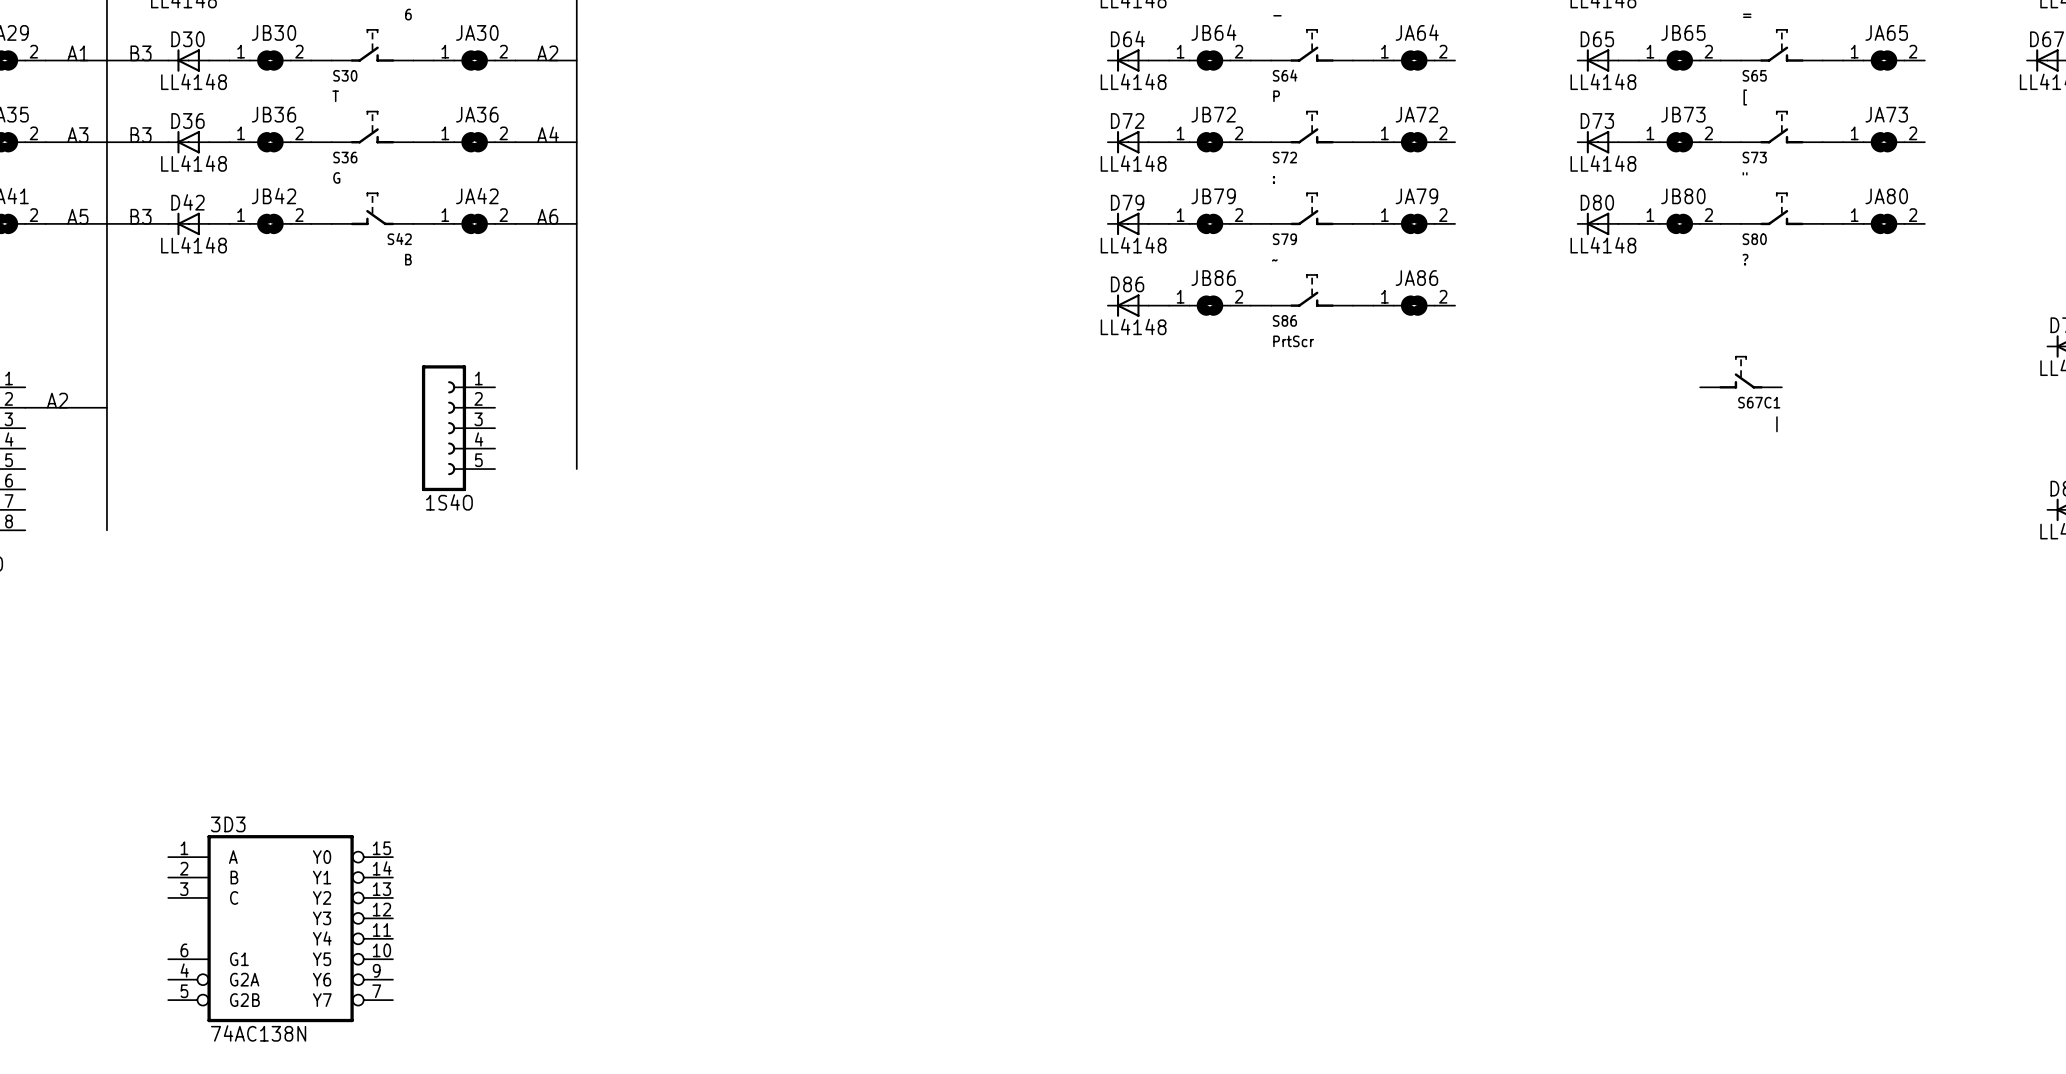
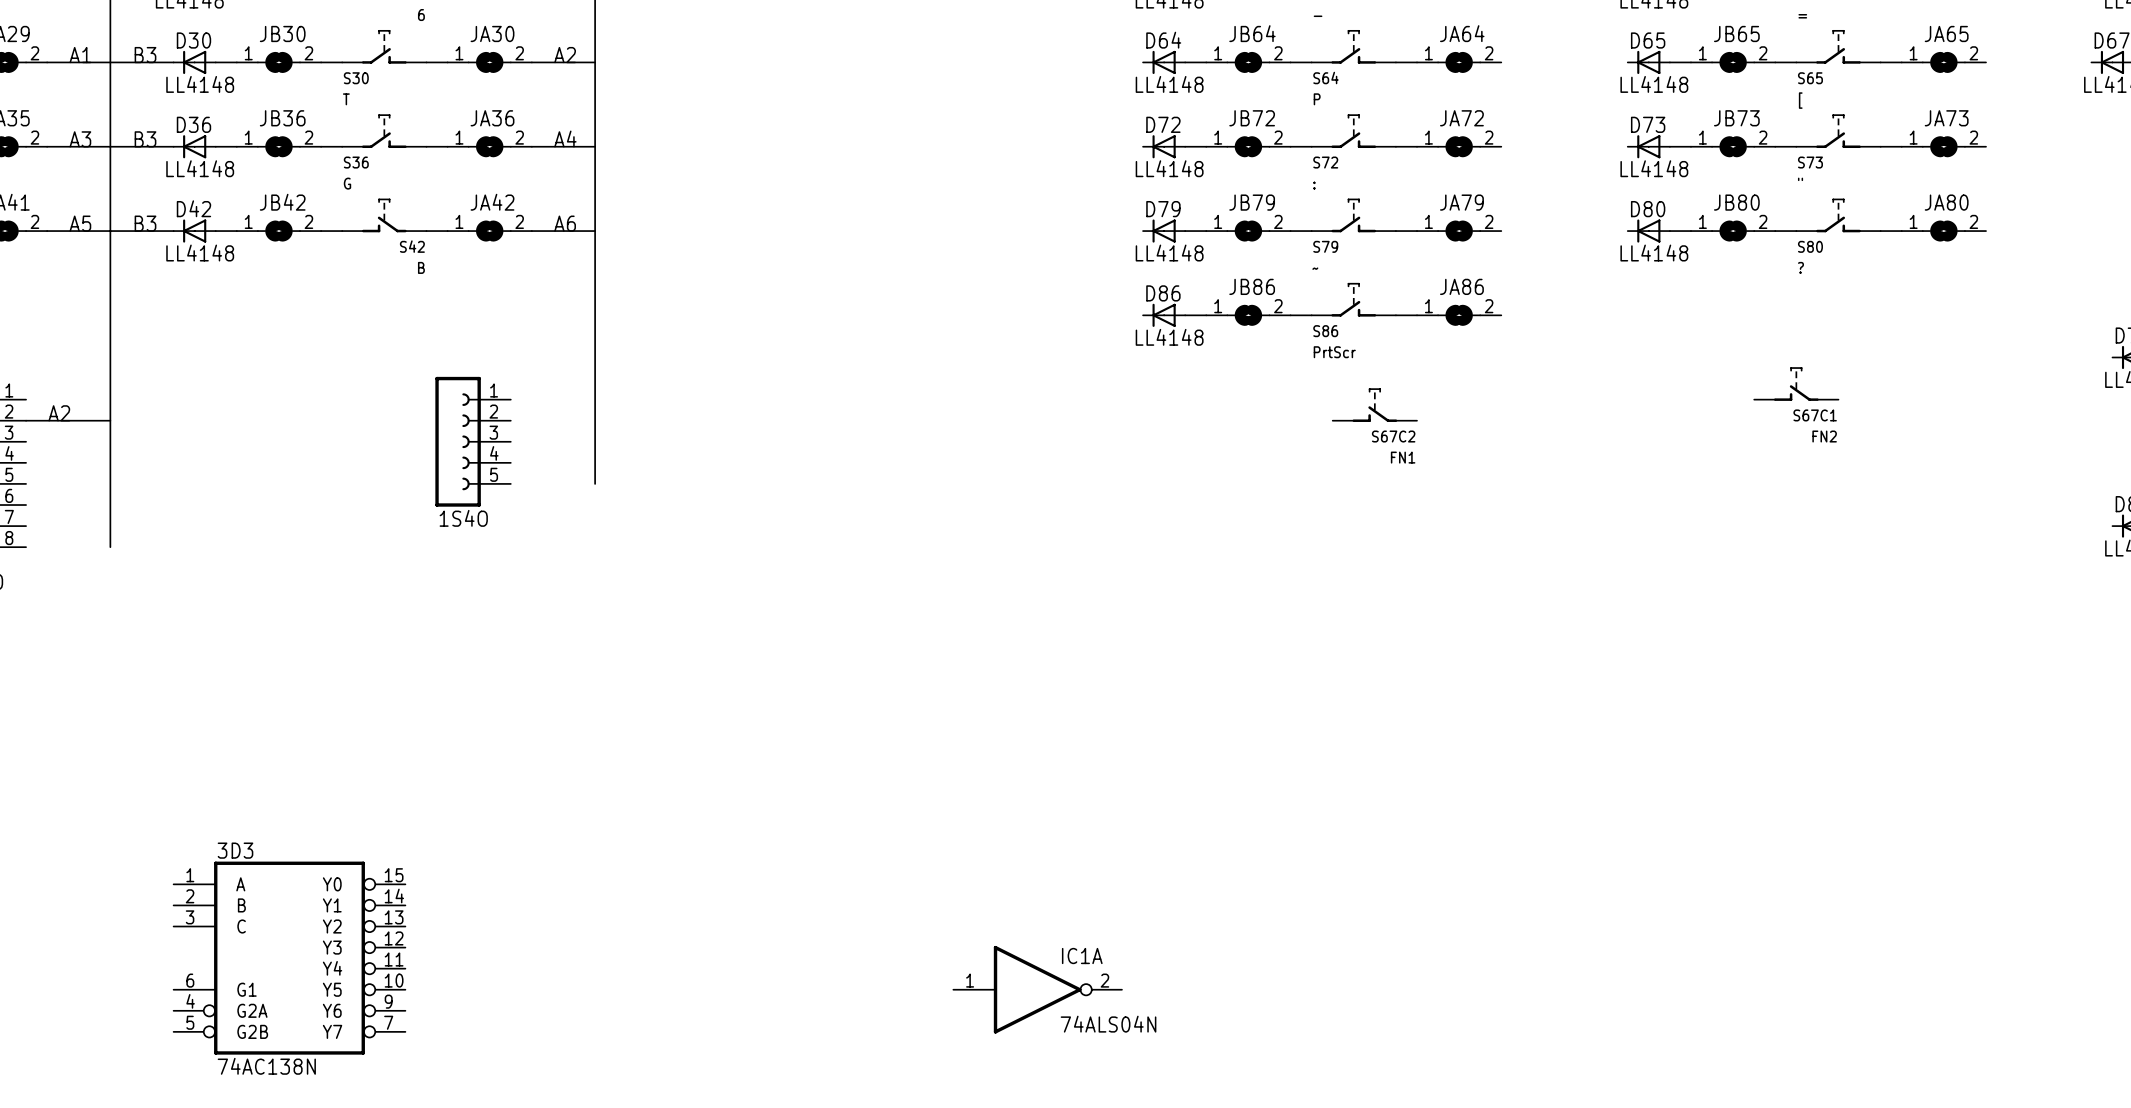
S67C2: none -> FN1 (1374, 405)
S67C1 value: | (1776, 424) -> FN2 (1824, 436)
IC1A: none -> 74ALS04N (1037, 989)

